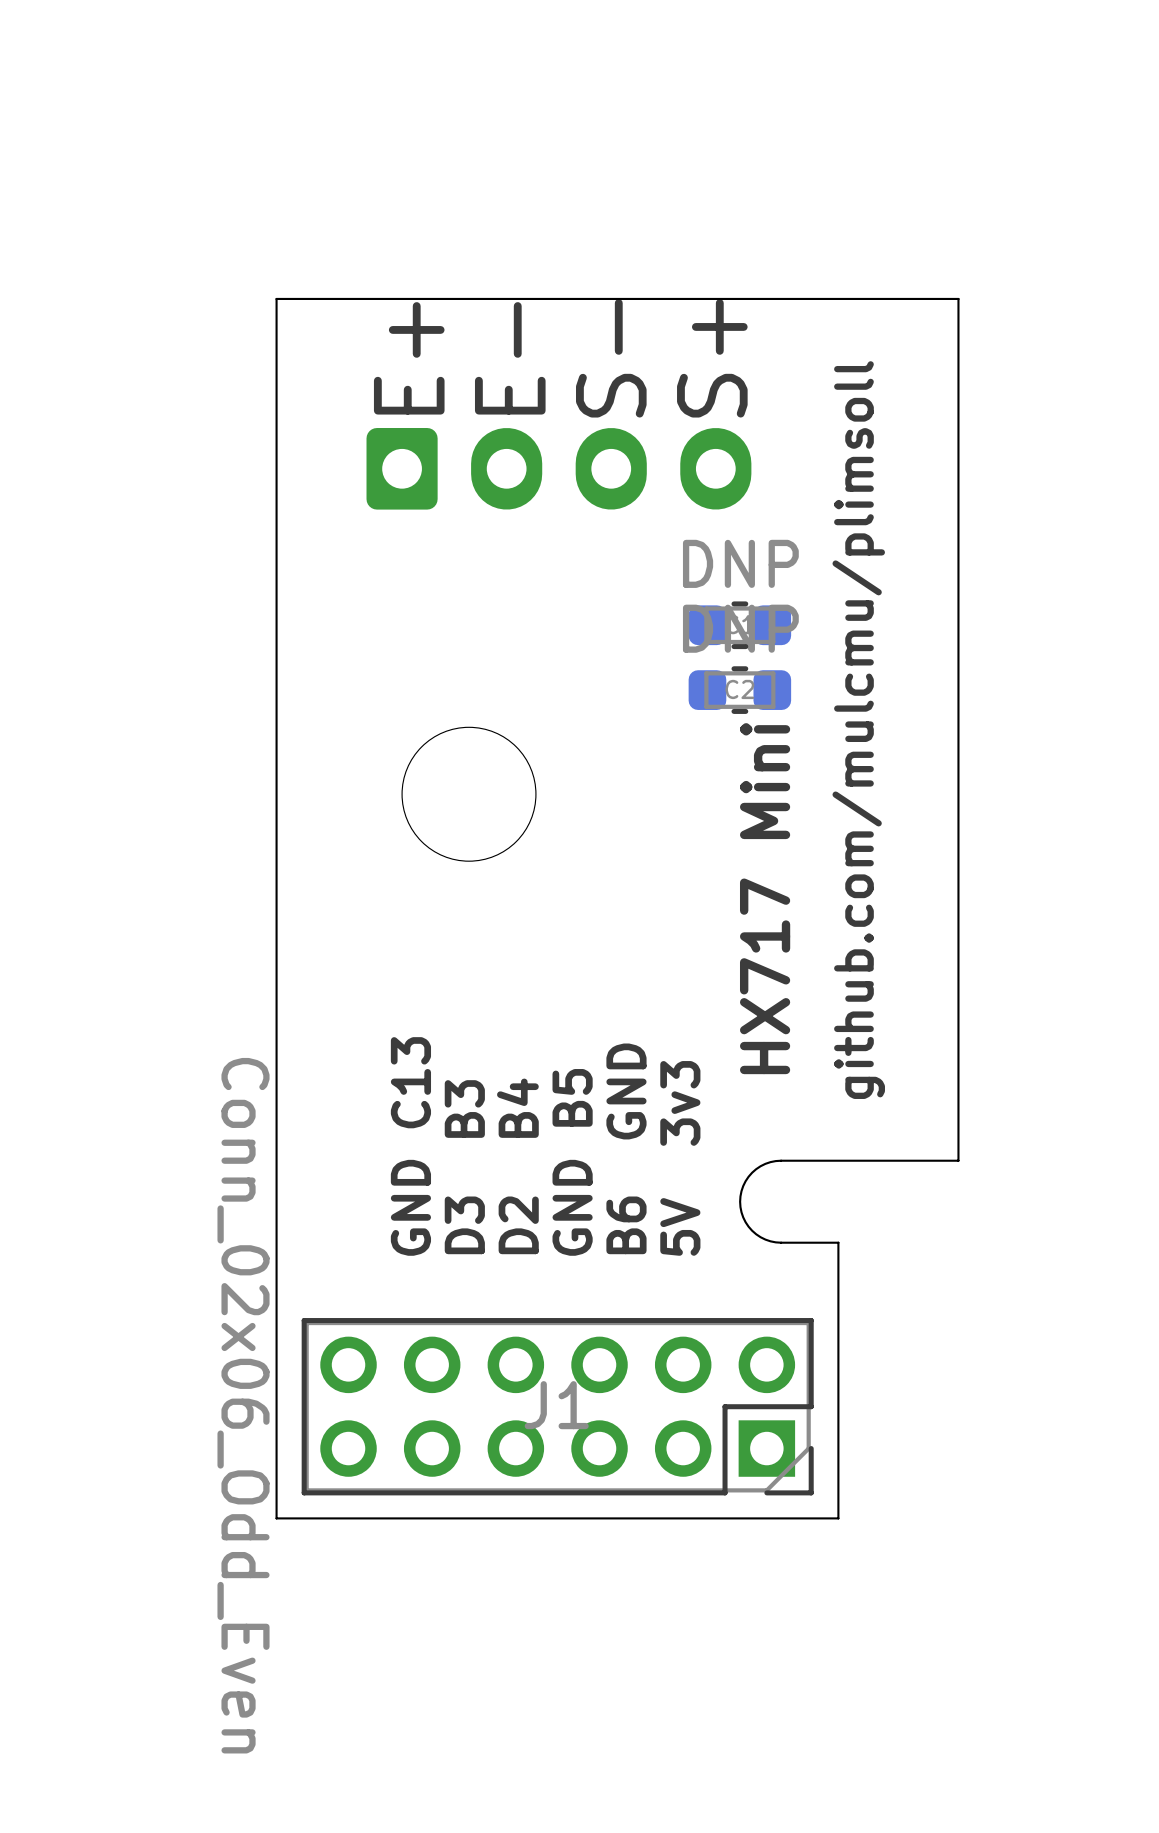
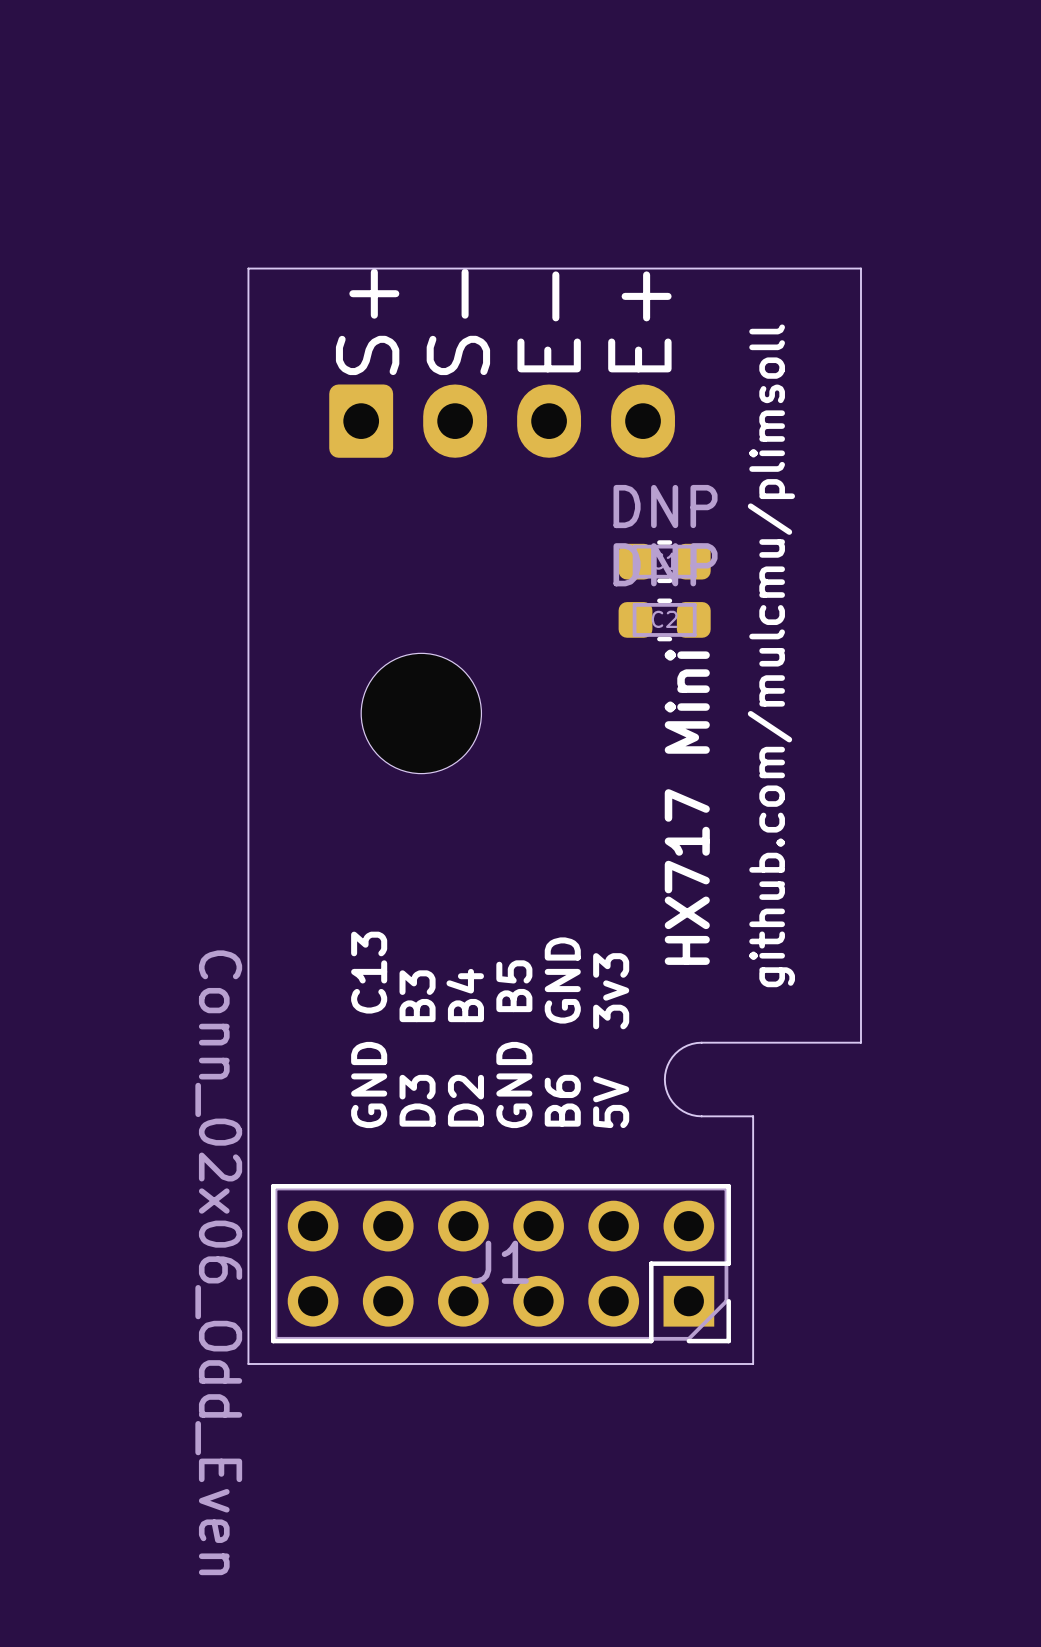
text: E+ (409, 358) -> S+ (367, 321)
text: E- (510, 358) -> S- (458, 321)
text: S- (611, 358) -> E- (549, 321)
text: S+ (712, 358) -> E+ (639, 321)

